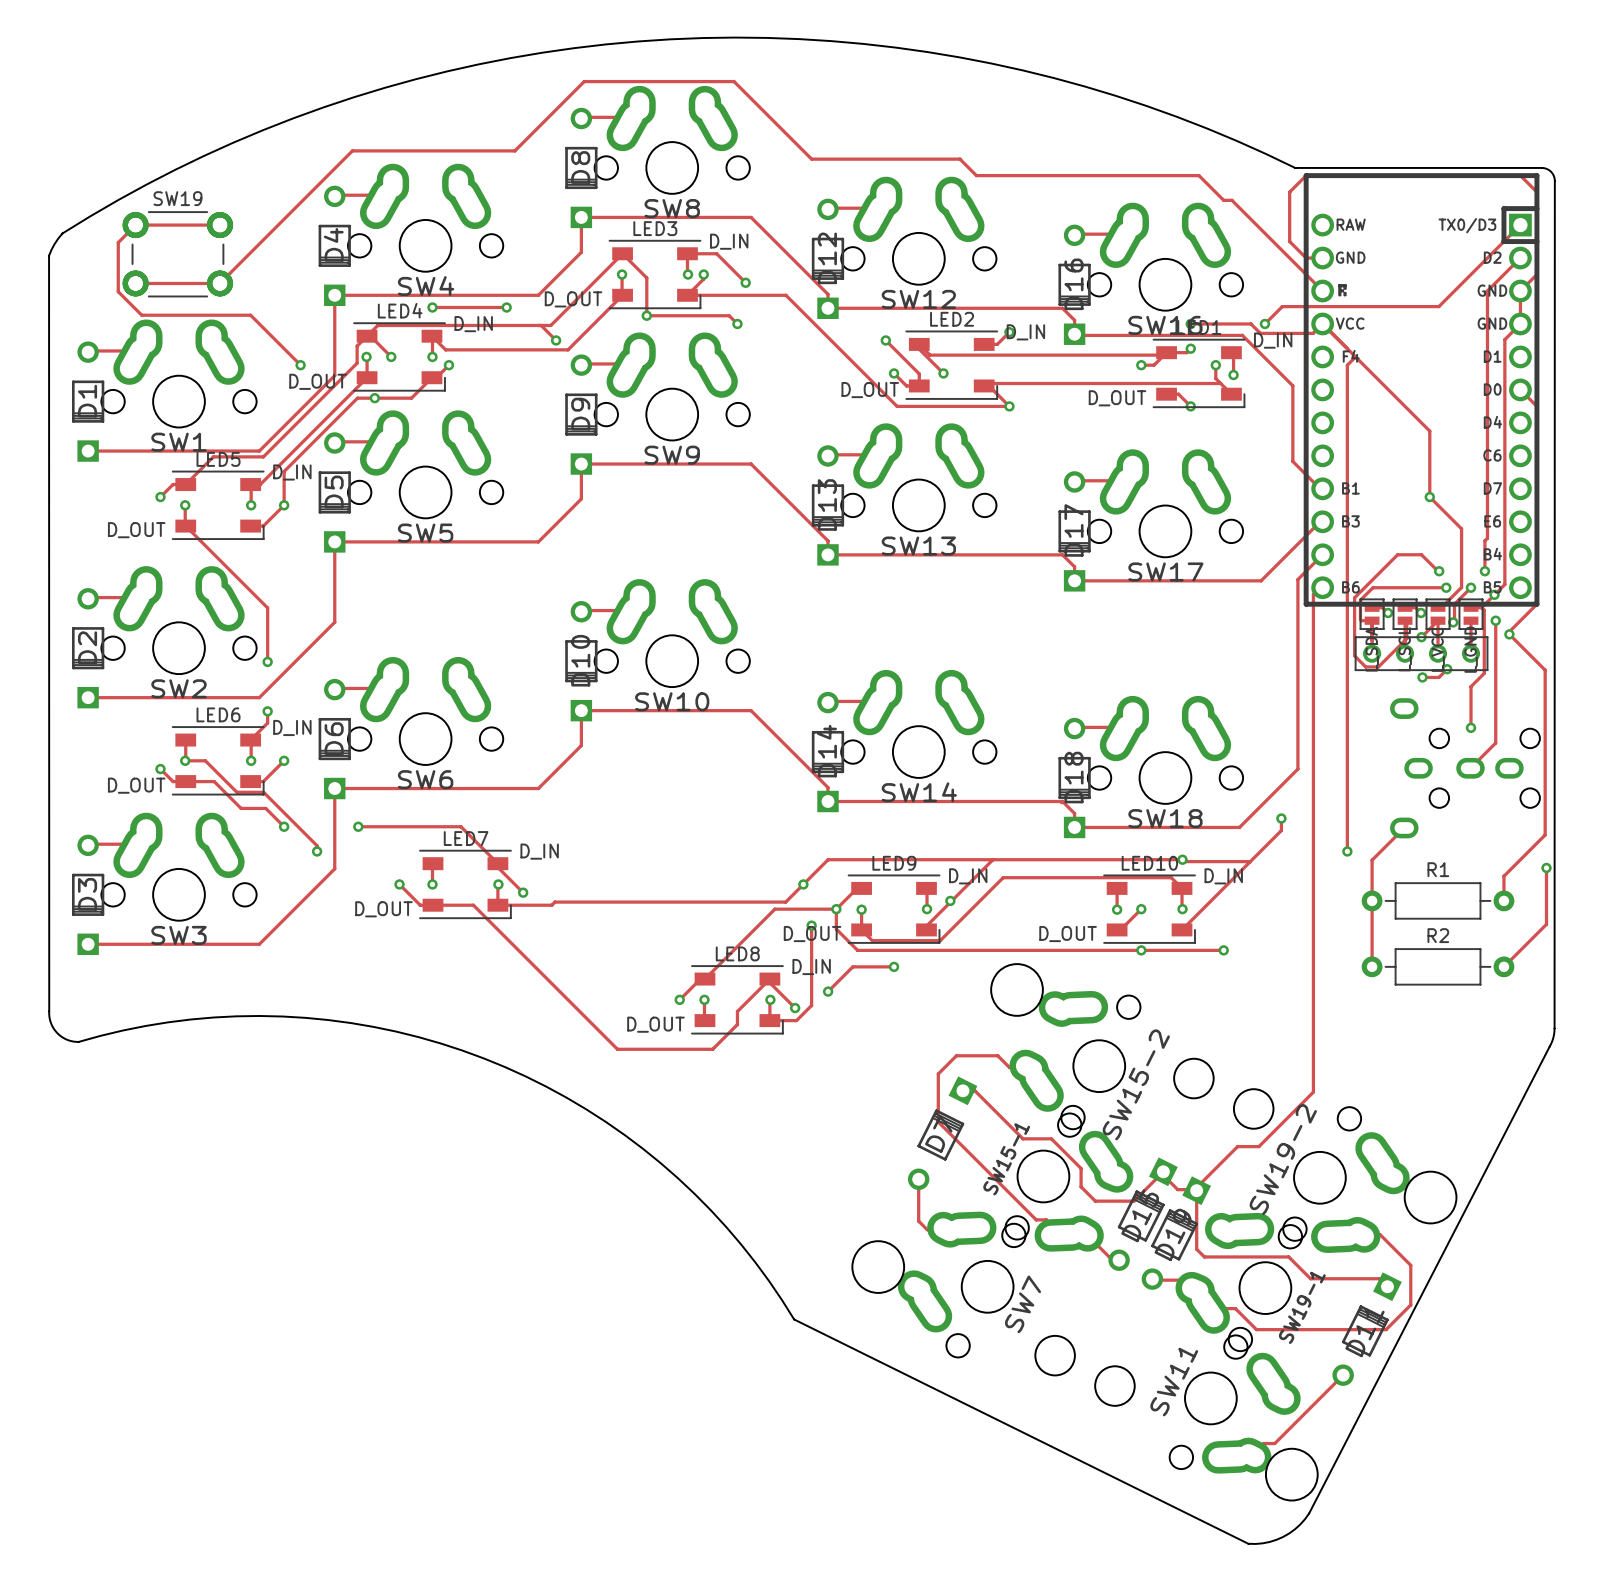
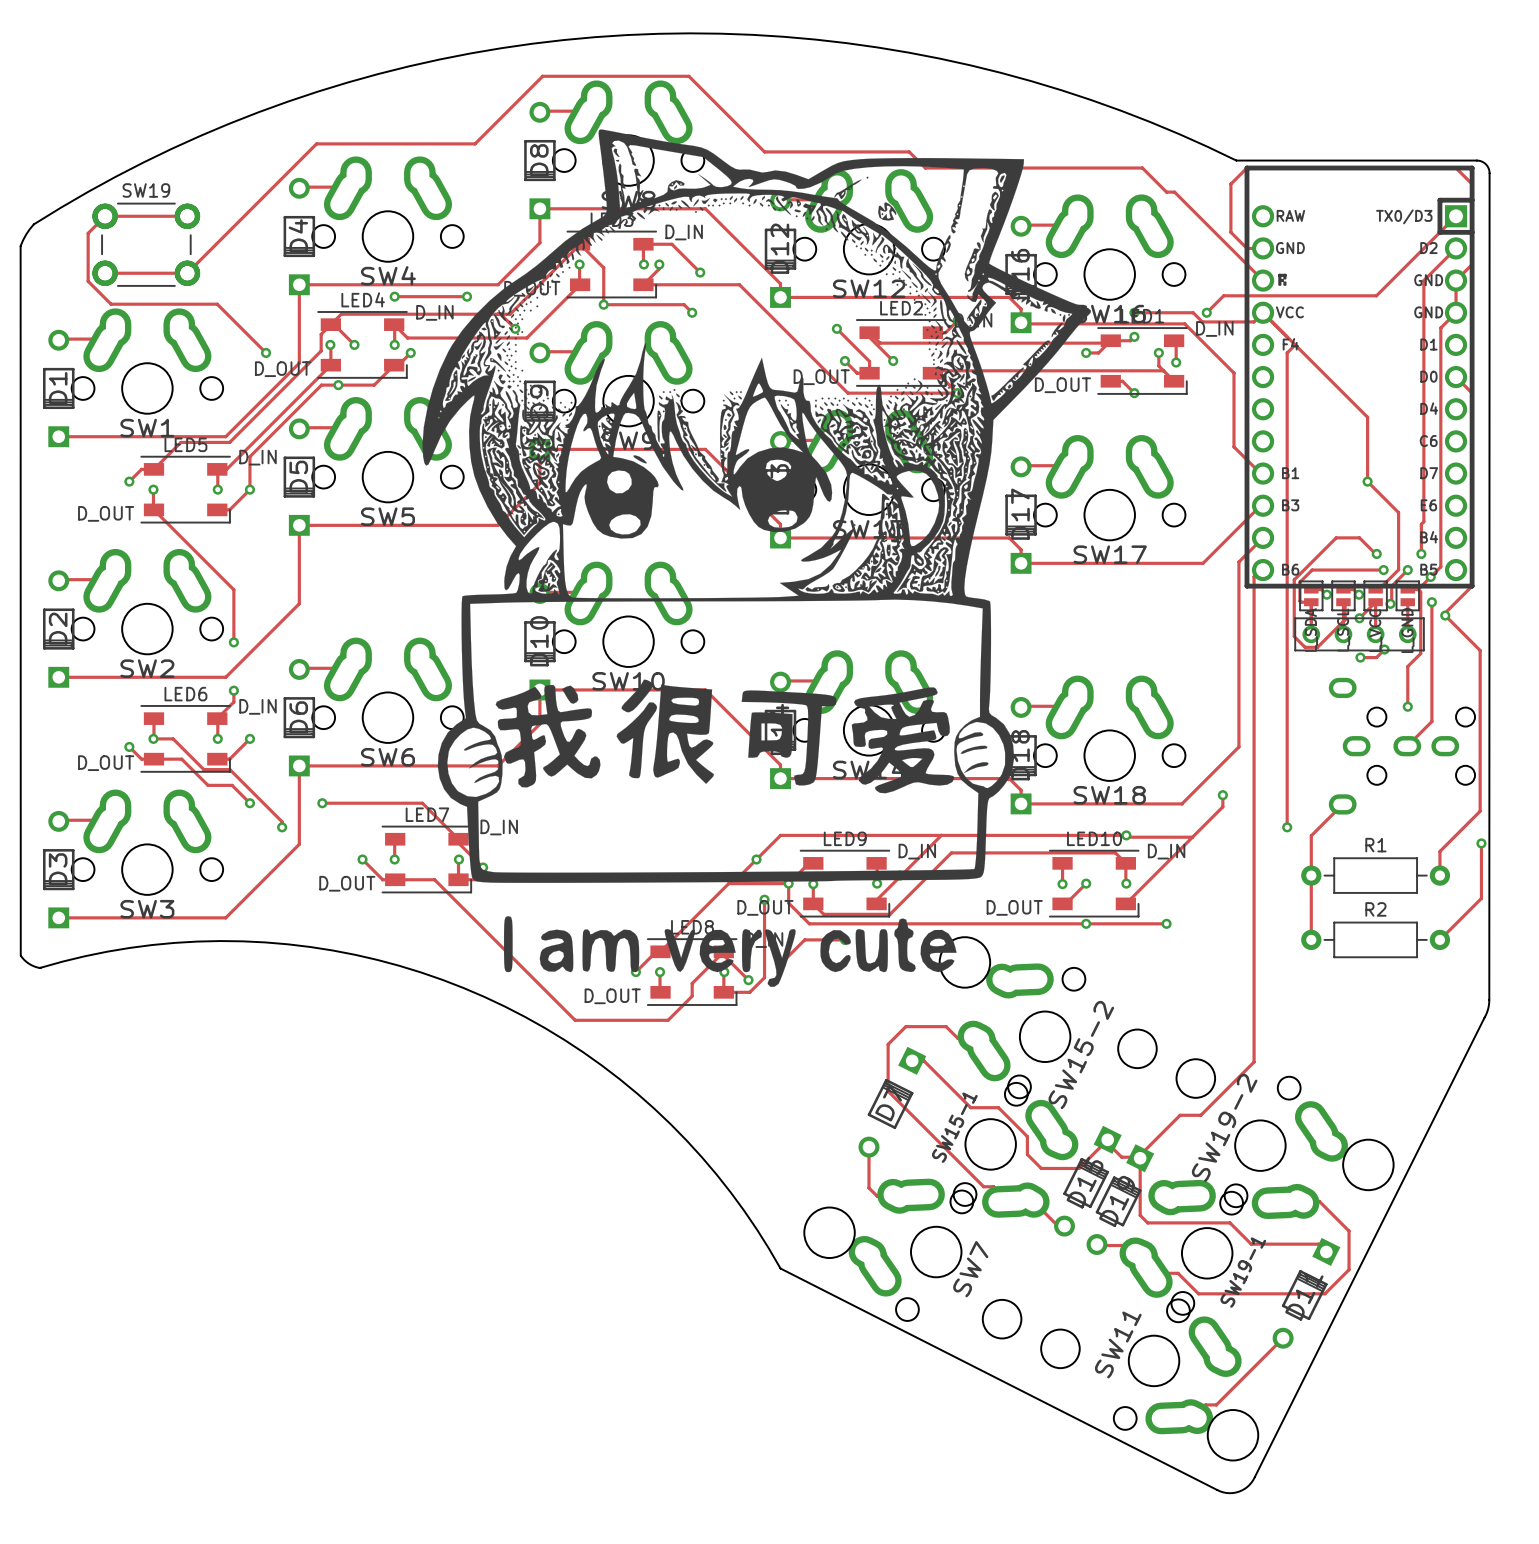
drawing: none -> [422, 129, 1091, 987]
board edge: (49, 983) (49, 1014) (51, 1024) (62, 1037) (78, 1041) -> none
board edge: (78, 1041) (123, 1030) (190, 1019) (236, 1016) (305, 1017) (373, 1026) (418, 1037) (462, 1050) (505, 1067) (566, 1097) (605, 1121) (642, 1148) (677, 1178) (710, 1210) (741, 1244) (769, 1281) (794, 1319) (1248, 1543) -> none
board edge: (1549, 1046) (1309, 1513) (1295, 1529) (1283, 1536) (1269, 1541) (1248, 1543) -> (1484, 1017) (1253, 1479) (1241, 1490) (1229, 1493) (1217, 1490) (780, 1268) (757, 1229) (716, 1174) (686, 1140) (654, 1108) (619, 1079) (583, 1052) (545, 1028) (484, 996) (442, 979) (377, 959) (332, 950) (287, 944) (219, 941) (152, 945) (84, 956) (39, 967) (29, 963) (20, 955)

